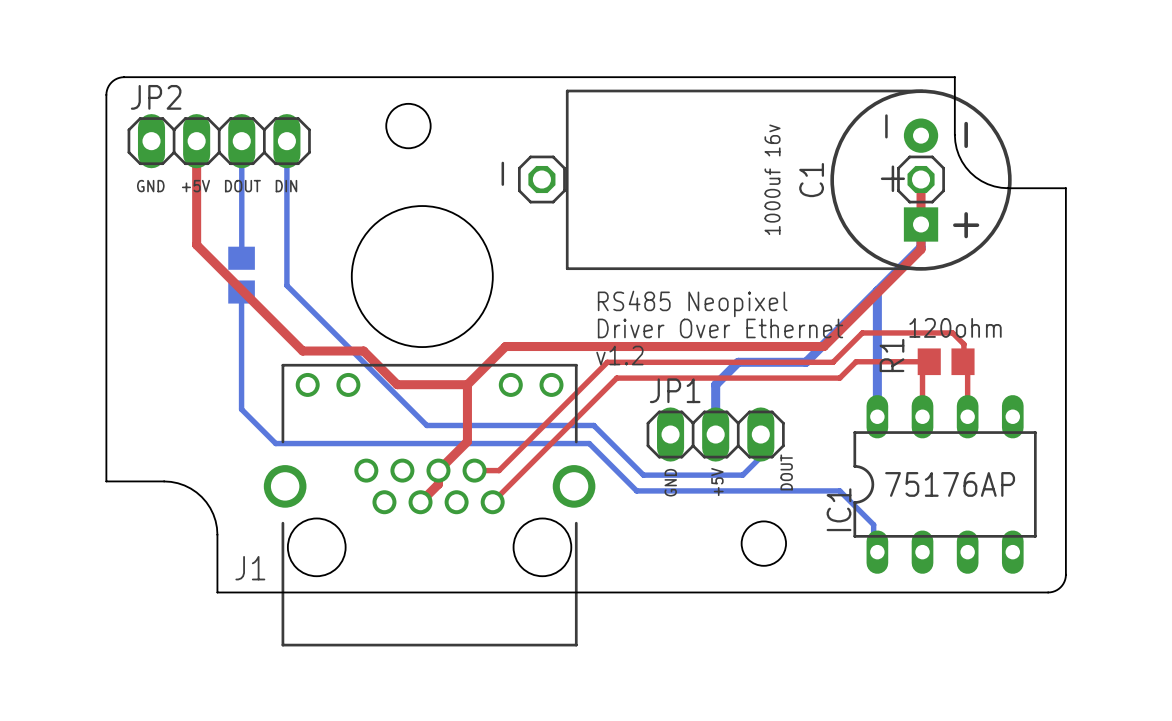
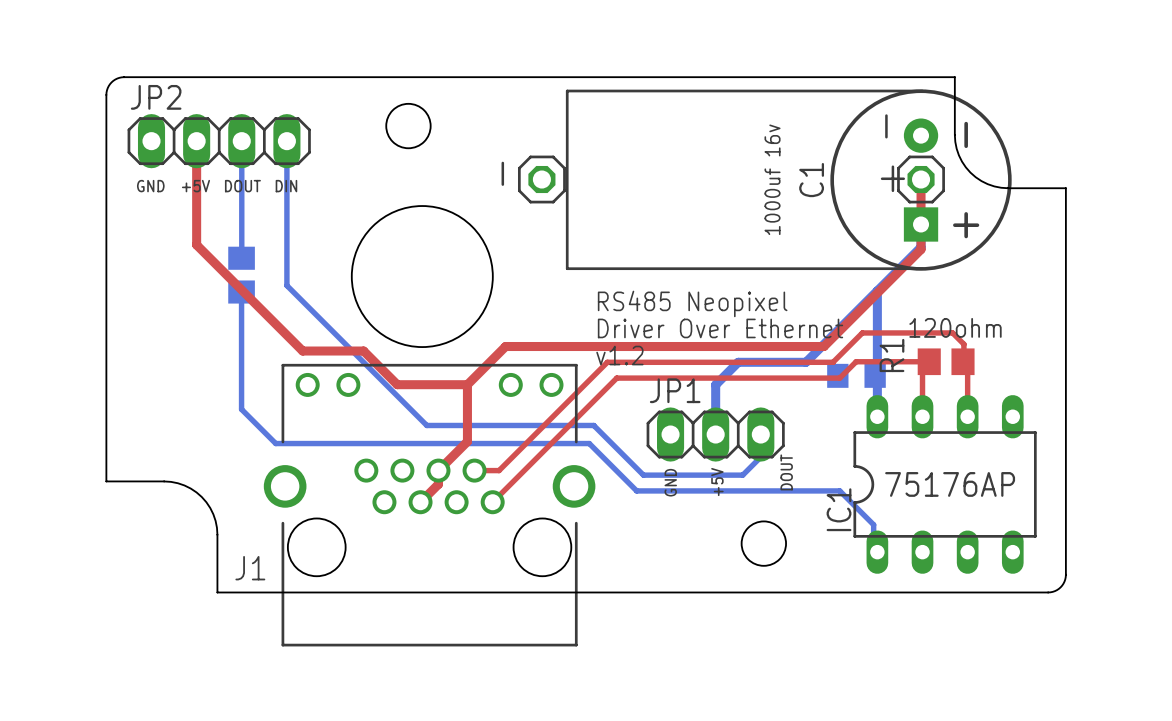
part: none -> (856, 375)

